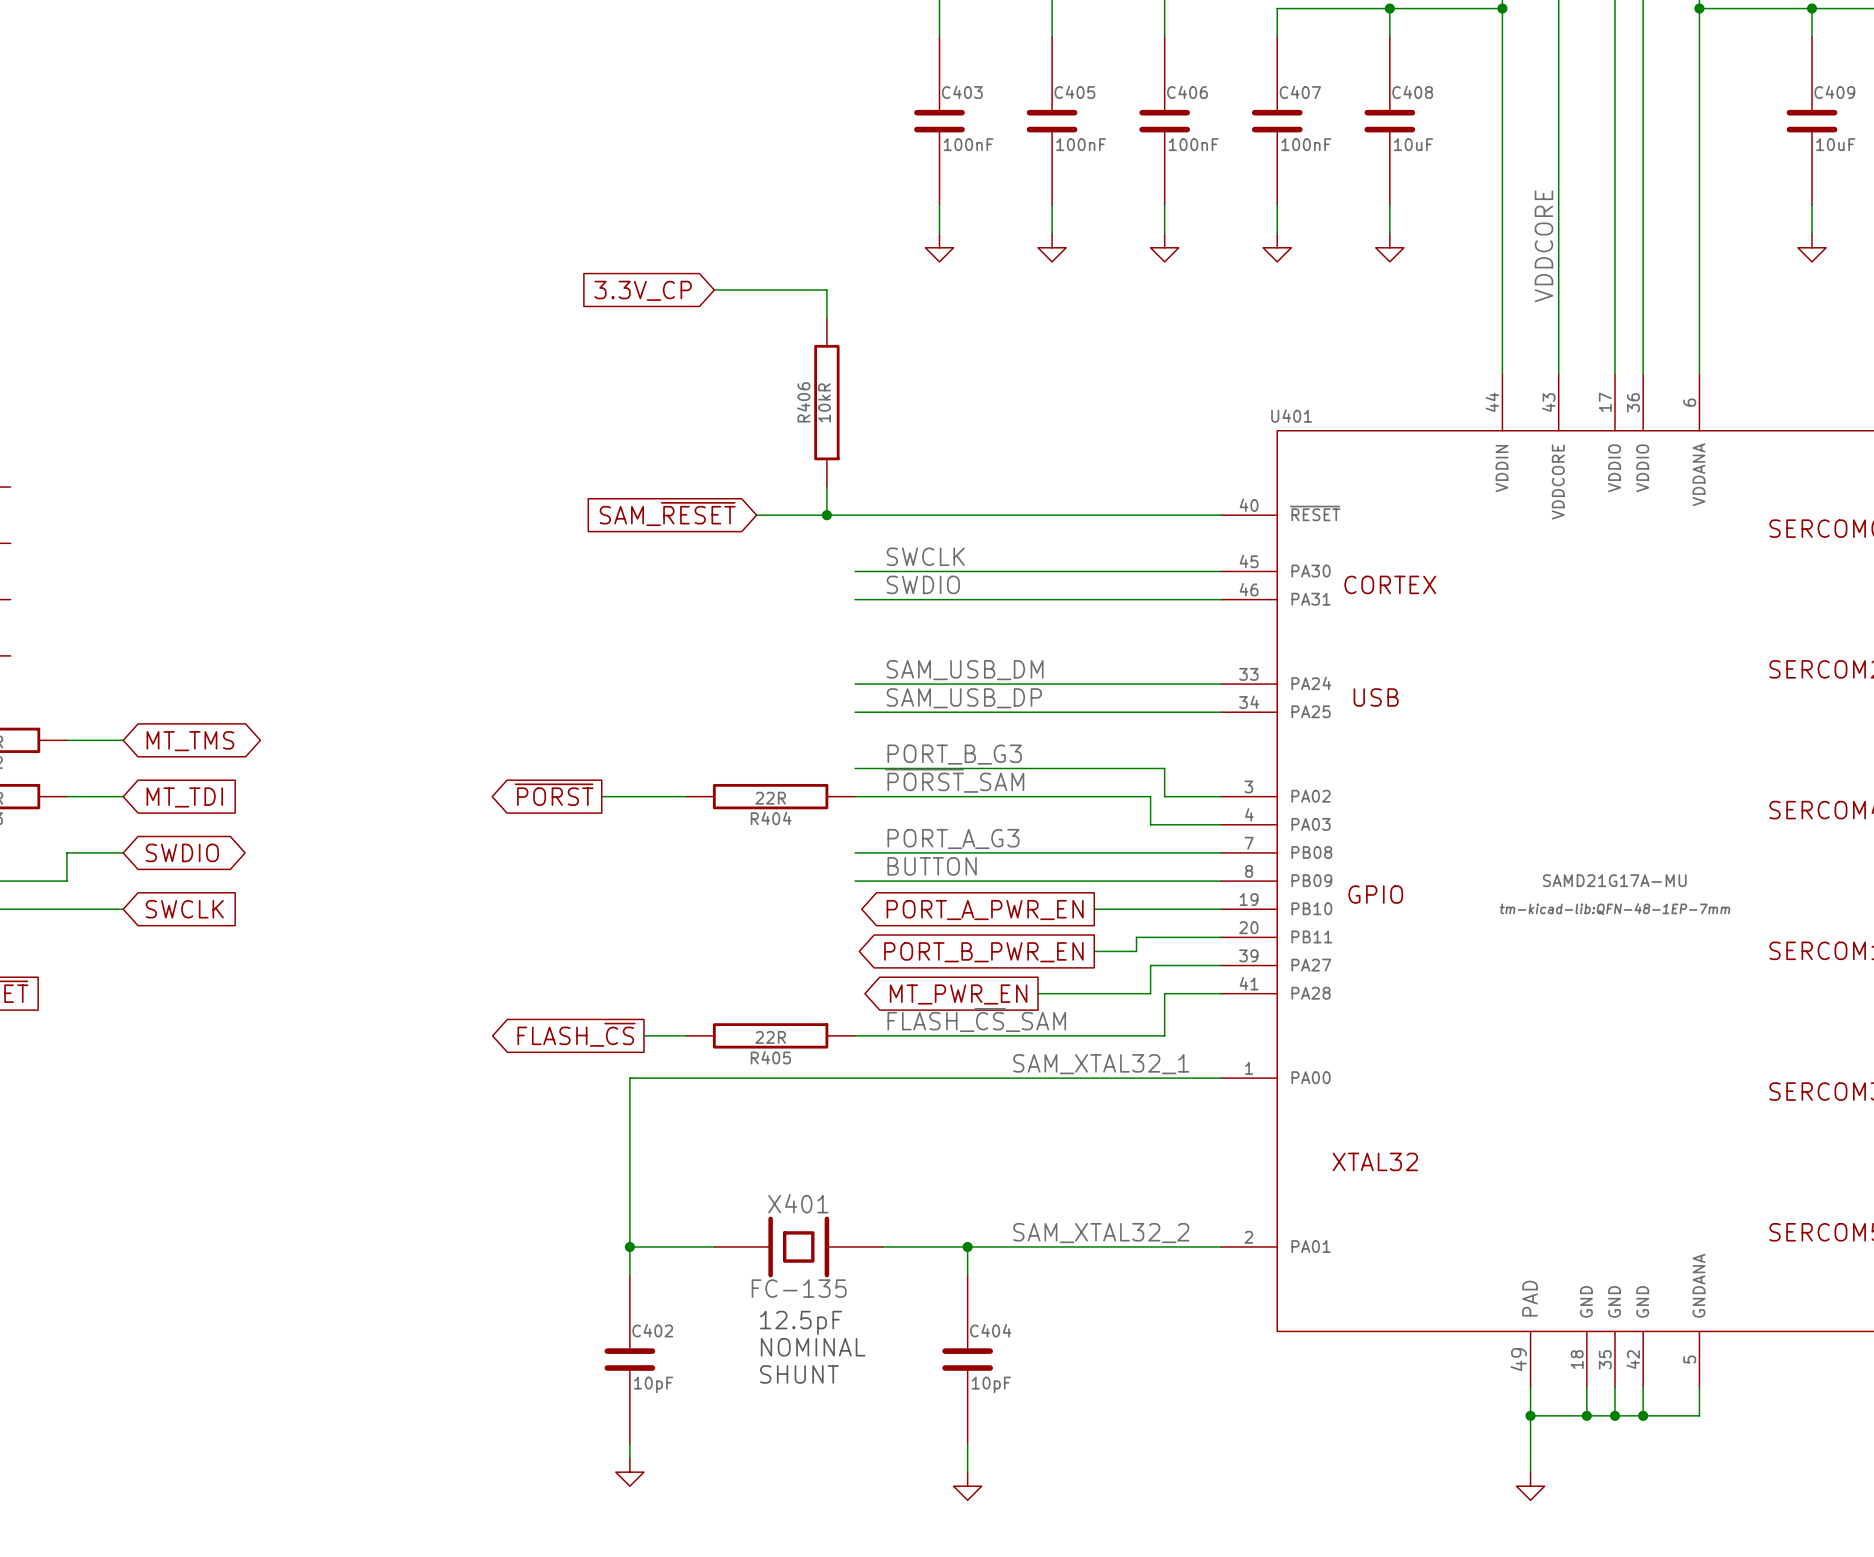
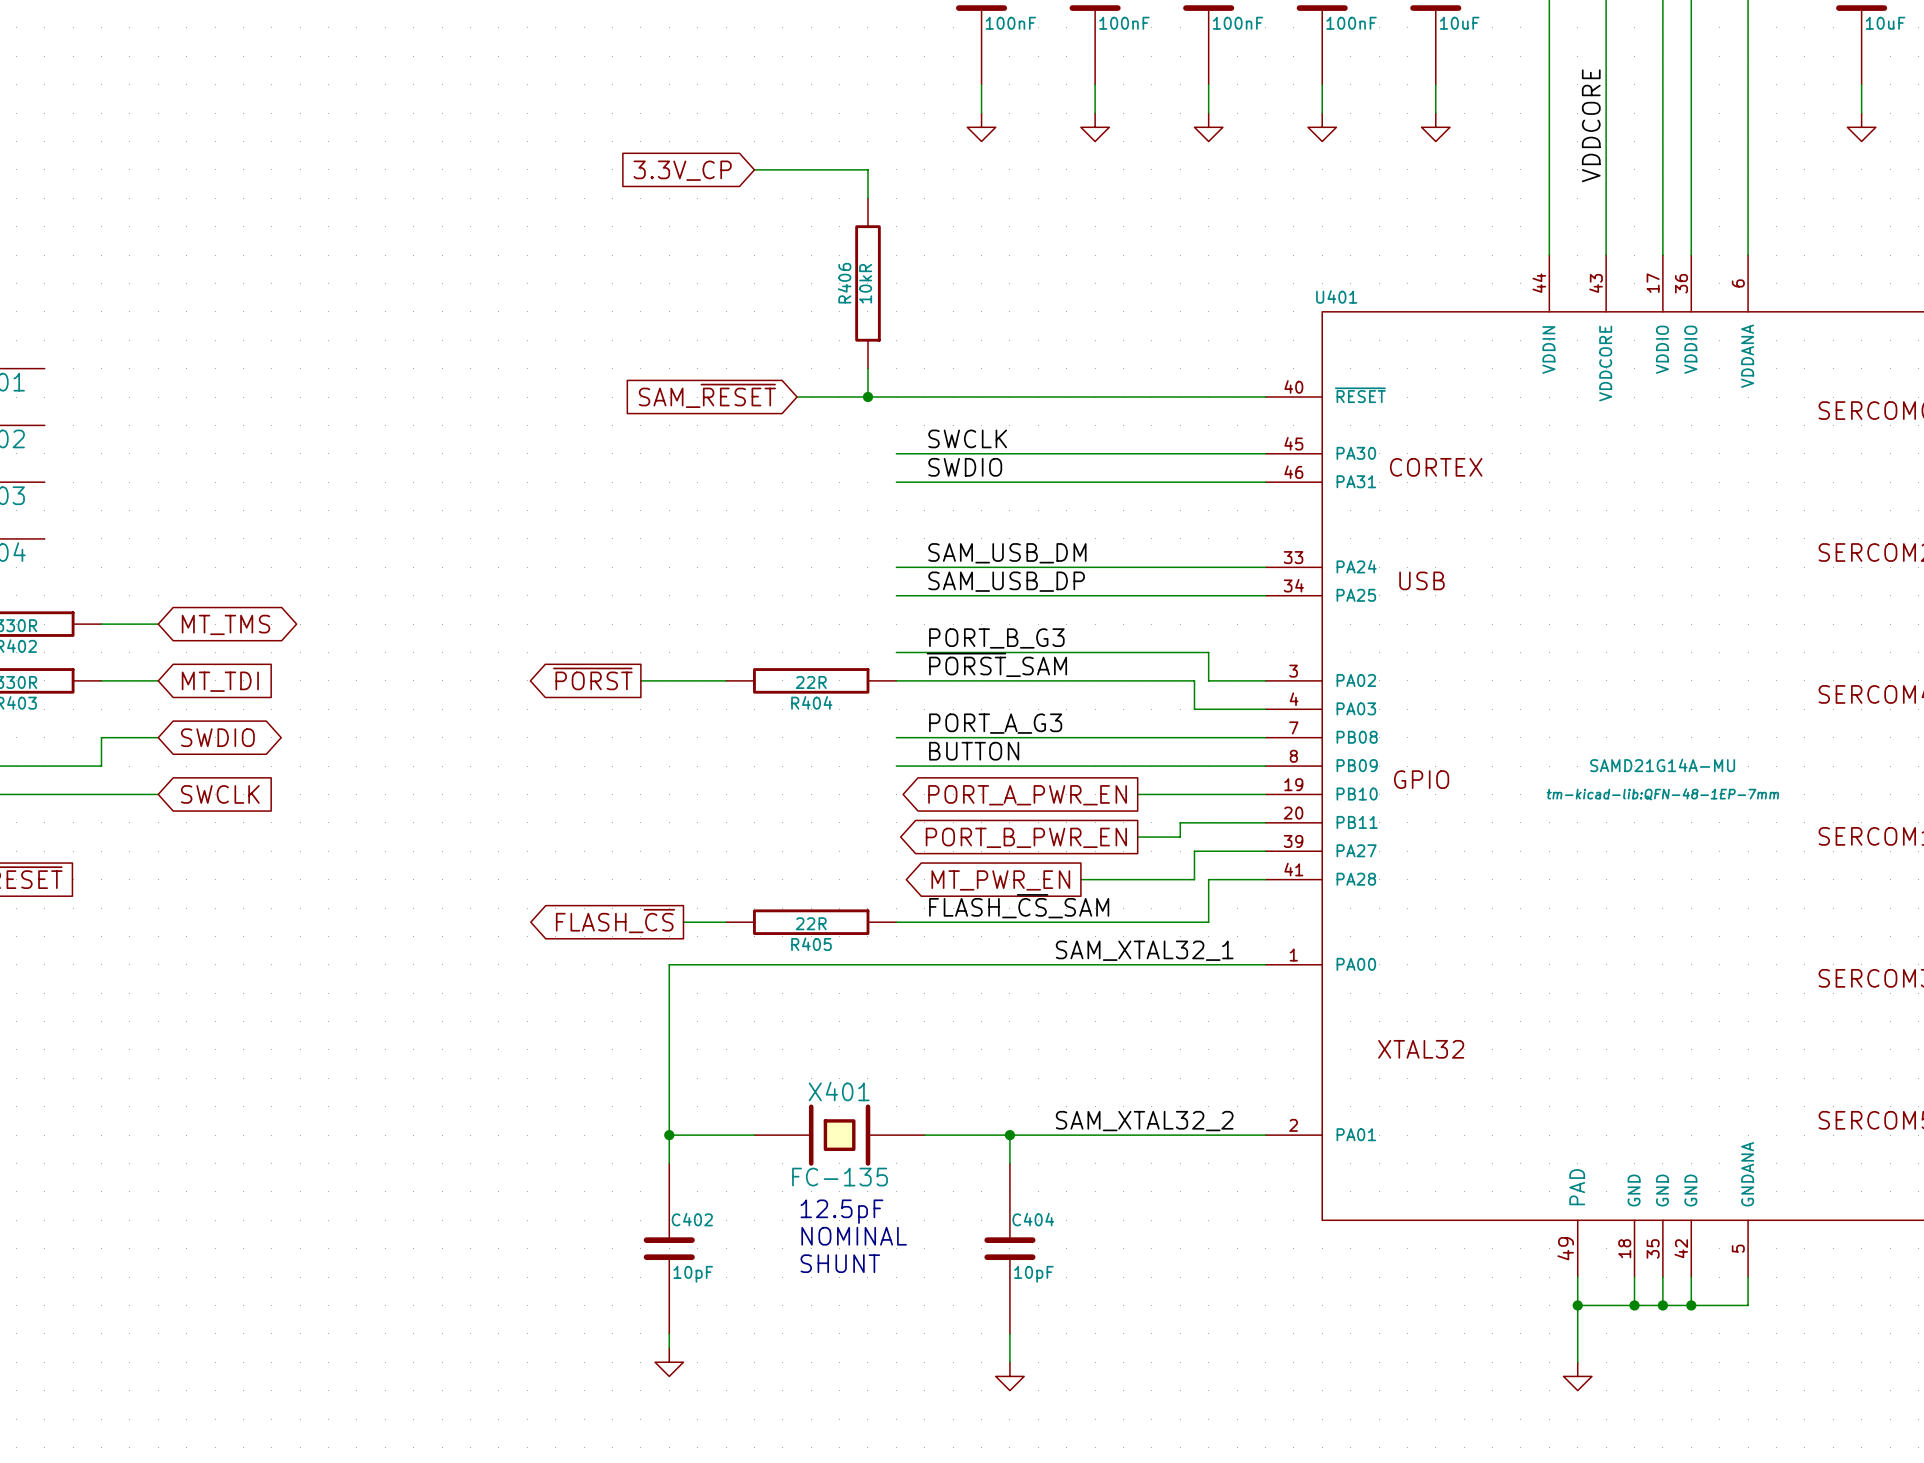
U401 value: SAMD21G17A-MU (1614, 880) -> SAMD21G14A-MU (1662, 765)

